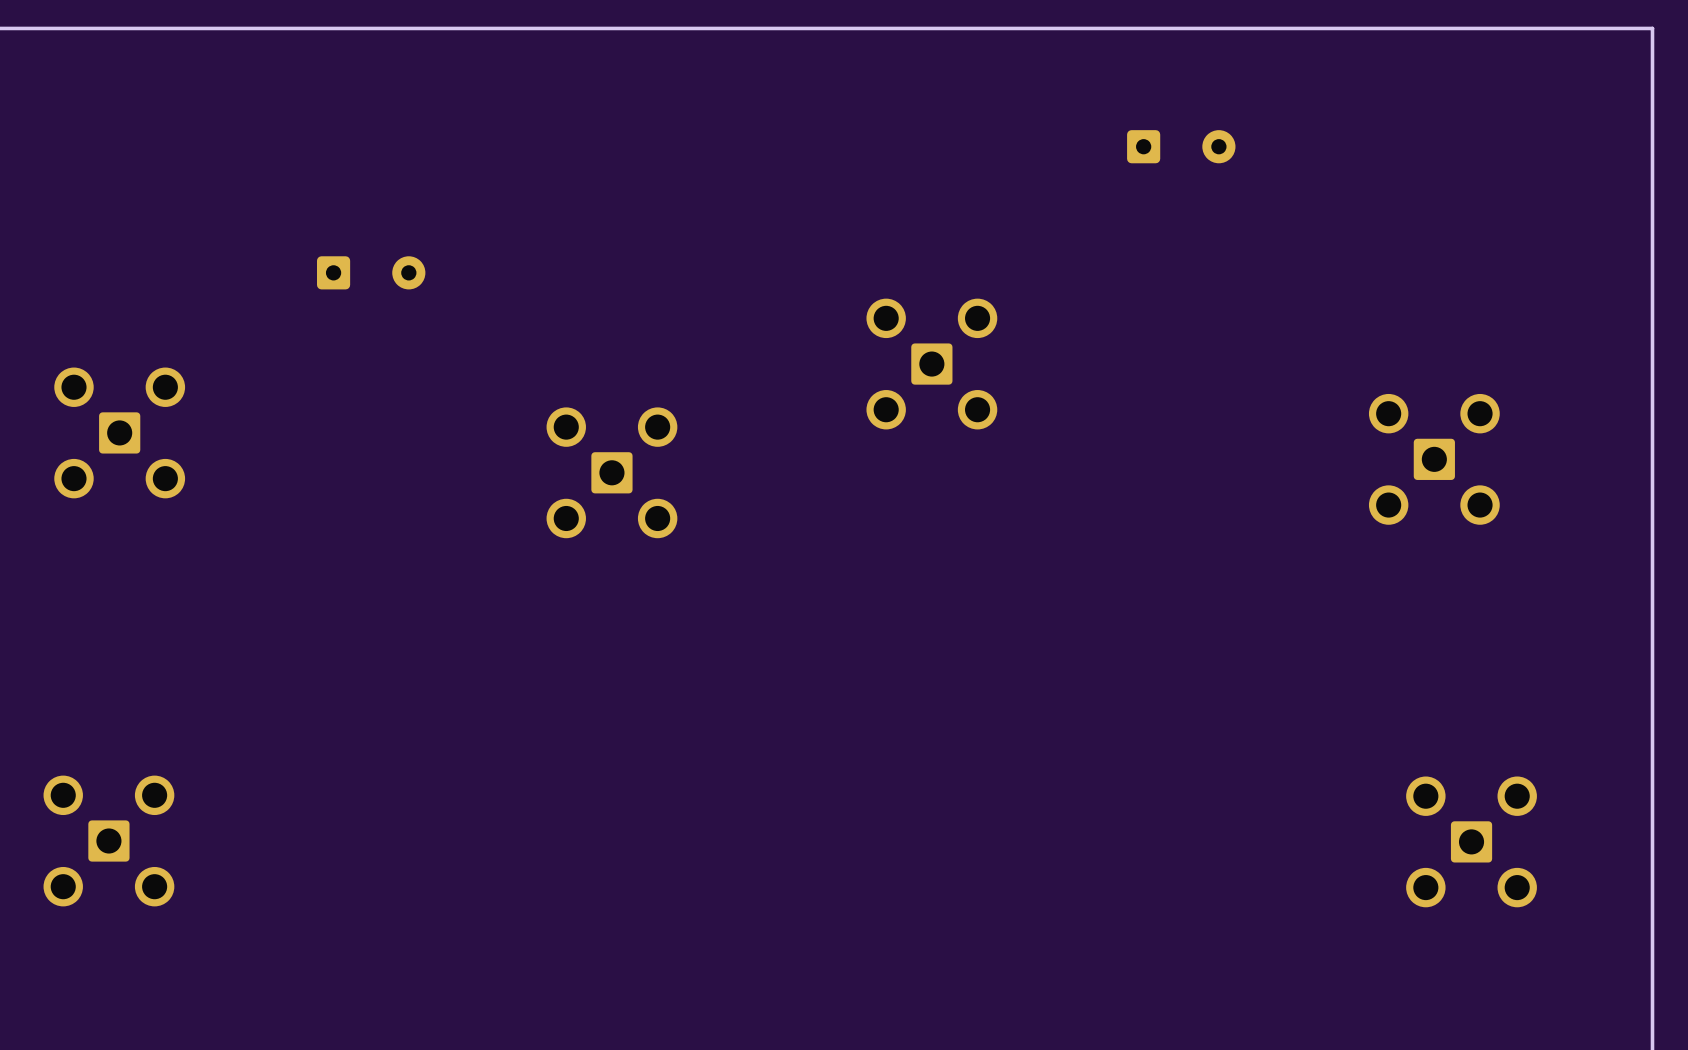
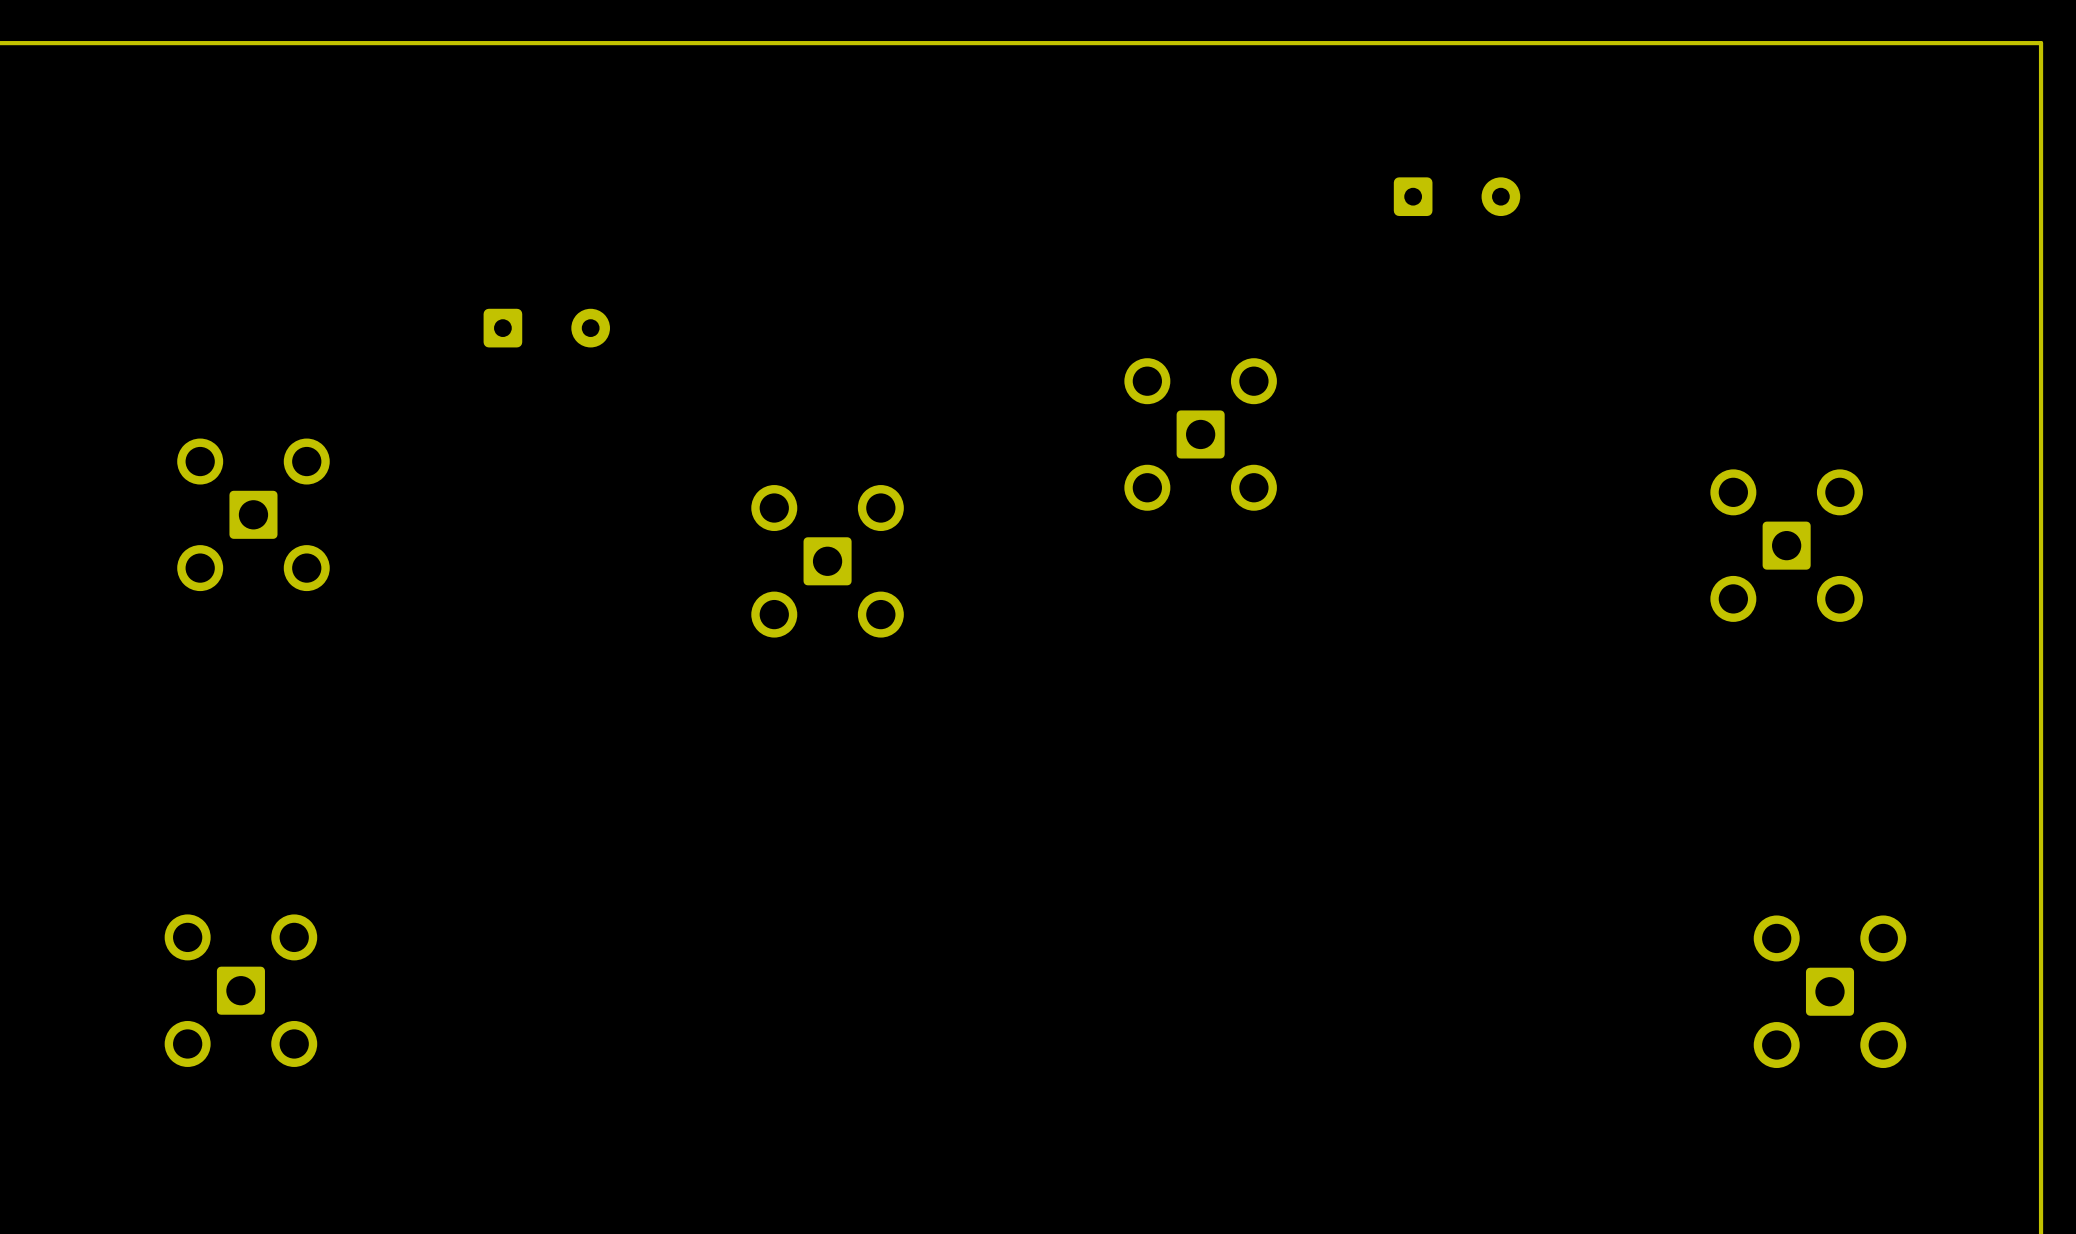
part position: (1181, 146) -> (1457, 196)

